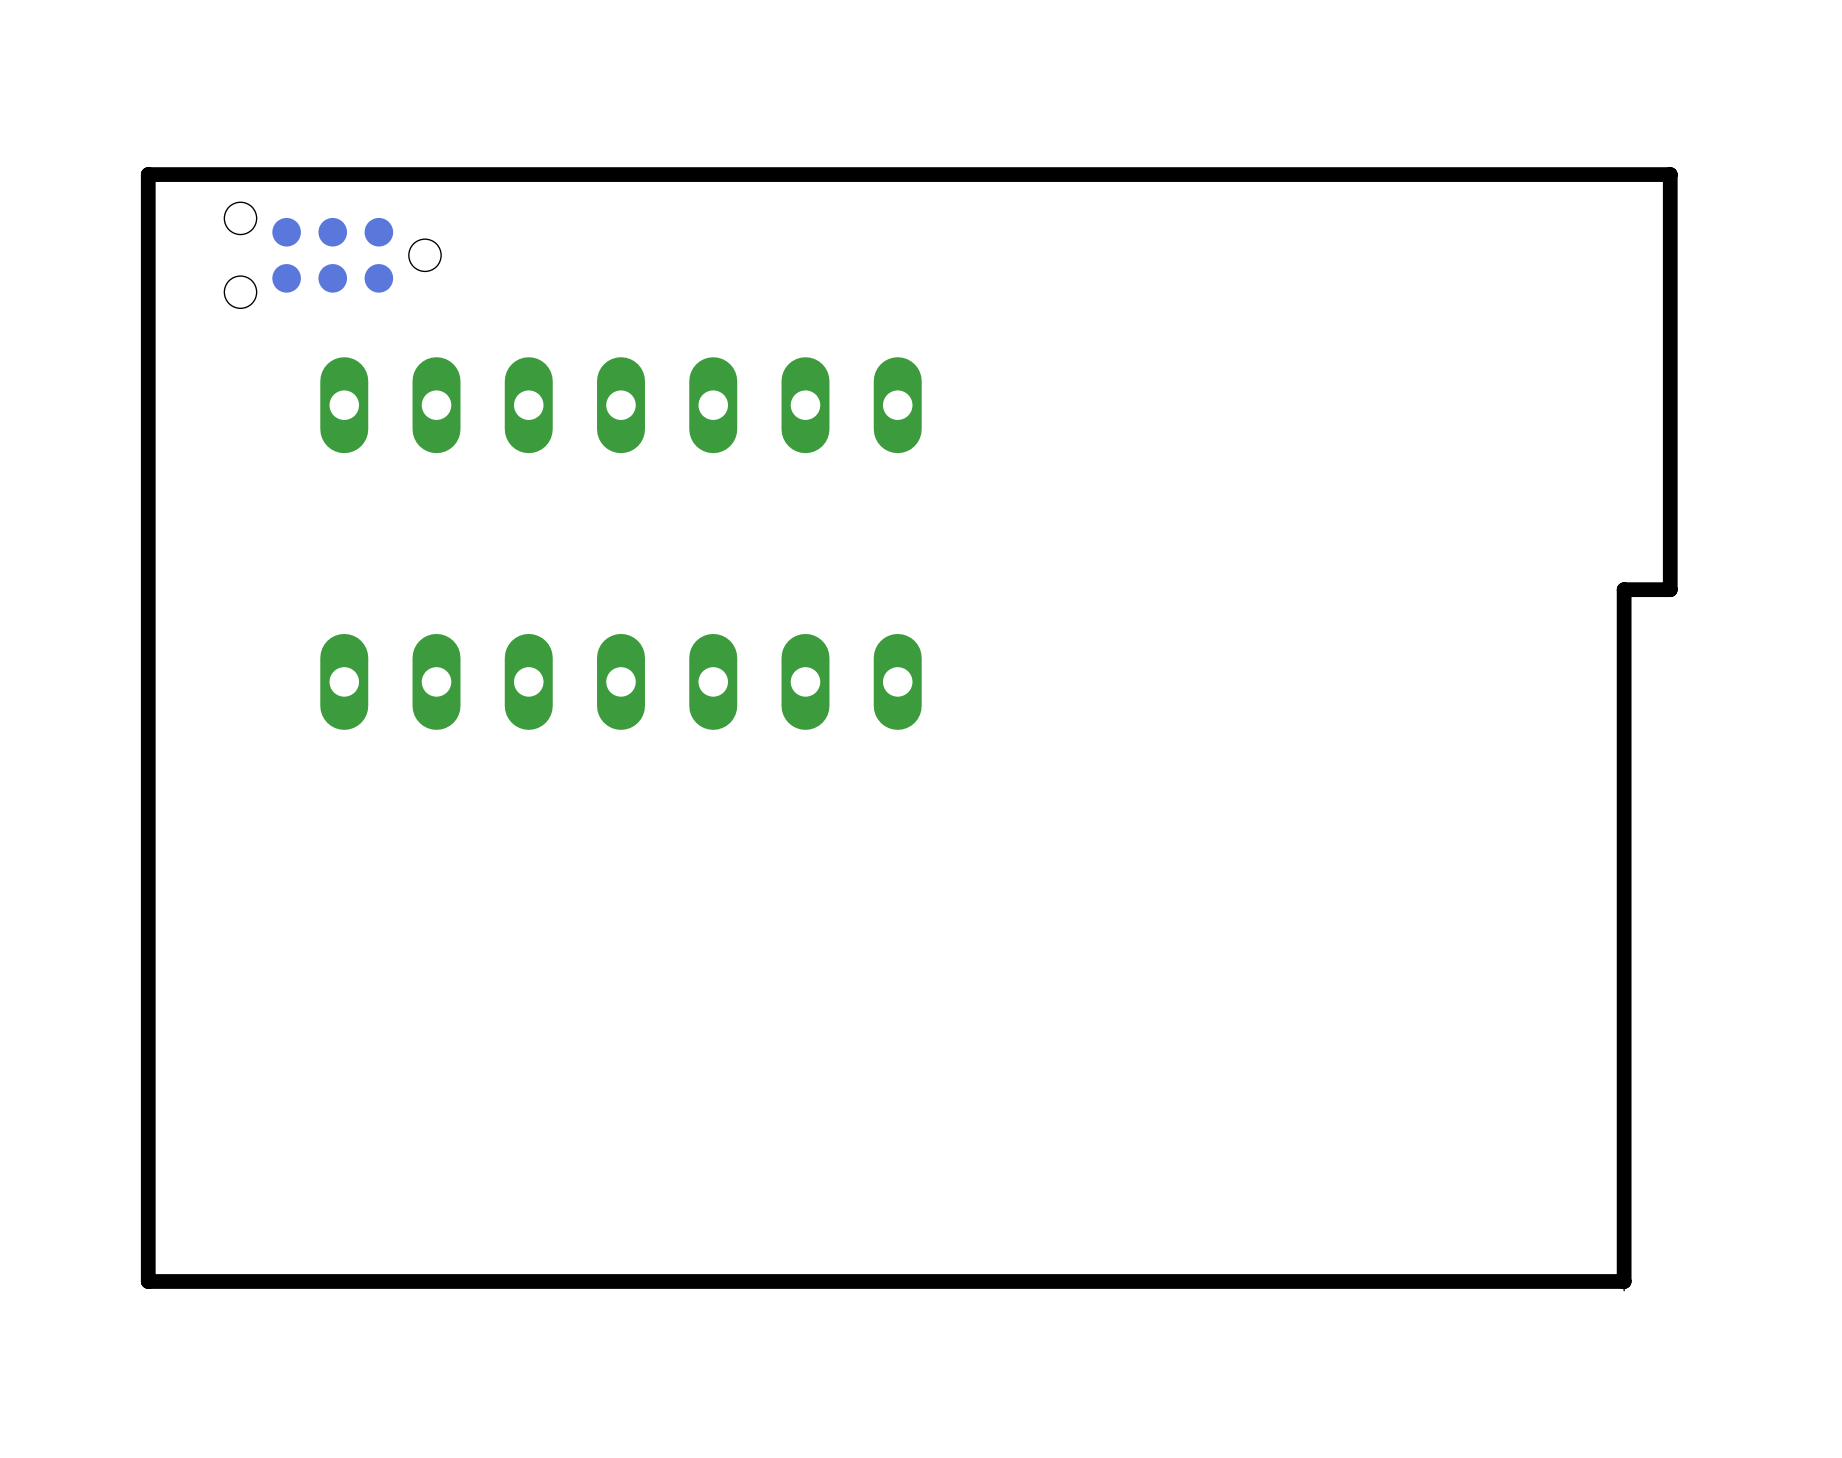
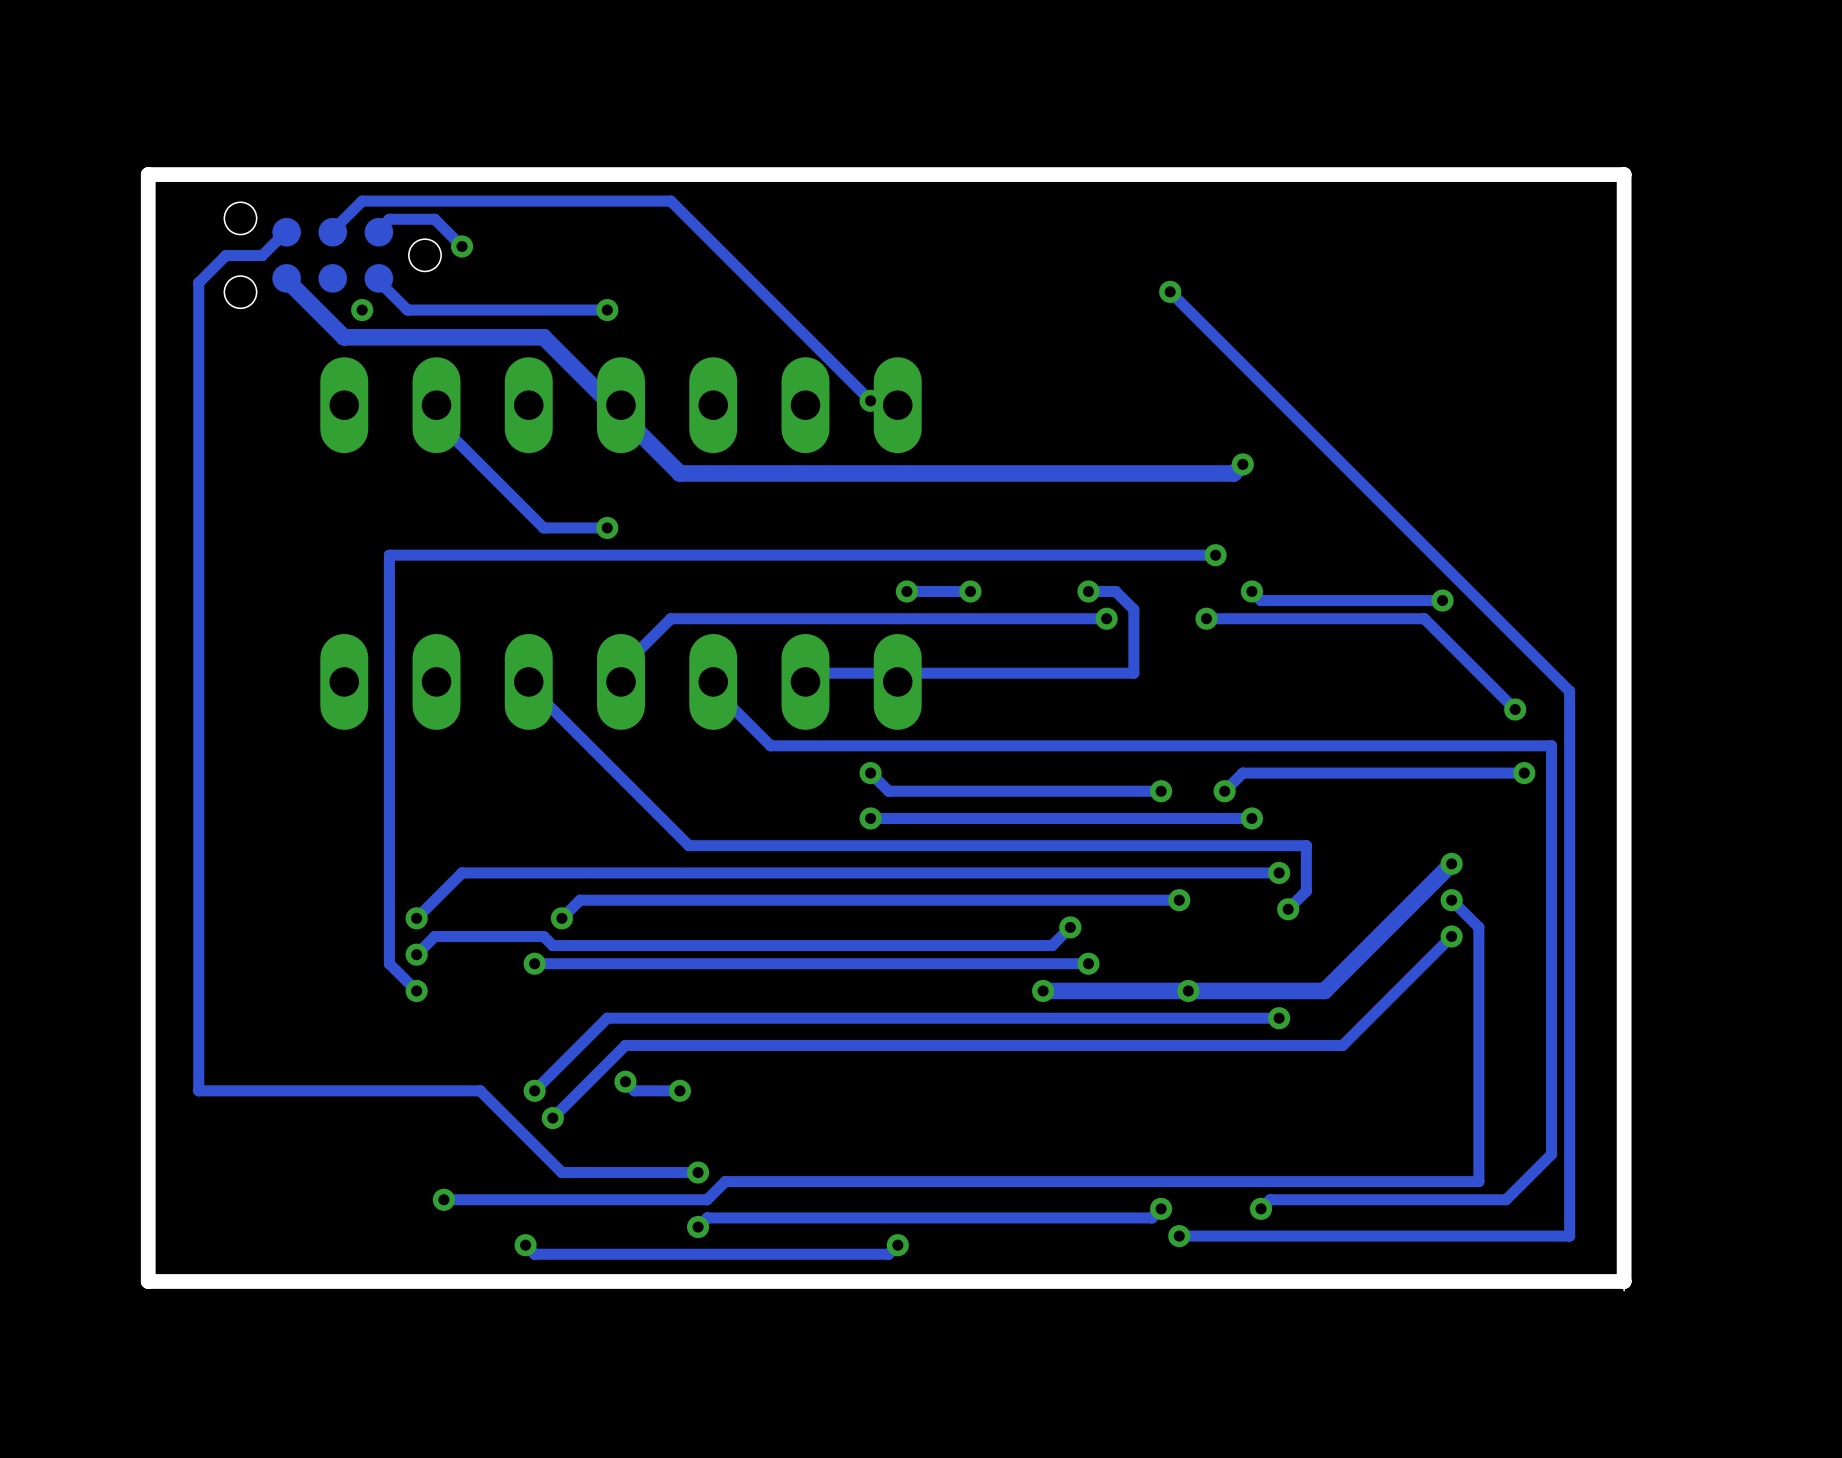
board edge: (1624, 174) (1670, 174) (1670, 589) (1624, 589) -> (1624, 174) (1624, 589)
track: none -> (286, 232) (262, 255) (225, 255) (198, 282) (198, 1090) (480, 1090) (561, 1172) (698, 1172)
track: none -> (332, 232) (362, 201) (670, 201) (870, 400)
track: none -> (378, 232) (389, 219) (434, 219) (462, 246)
via: none -> (462, 246)
track: none -> (286, 278) (344, 337) (543, 337) (609, 405) (679, 473) (1233, 473) (1242, 464)
track: none -> (378, 278) (380, 282) (407, 310) (607, 310)
track: none -> (1170, 291) (1569, 691) (1569, 1236) (1179, 1236)
via: none -> (1170, 291)
via: none -> (362, 310)
via: none -> (607, 310)
via: none -> (870, 400)
track: none -> (424, 405) (425, 409) (543, 527) (607, 527)
via: none -> (1242, 464)
via: none -> (607, 527)
track: none -> (1215, 555) (389, 555) (389, 963) (416, 990)
via: none -> (1215, 555)
via: none -> (906, 591)
track: none -> (970, 591) (906, 591)
via: none -> (970, 591)
track: none -> (1088, 591) (1115, 591) (1133, 609) (1133, 673) (797, 673) (793, 681)
via: none -> (1088, 591)
track: none -> (1251, 591) (1260, 600) (1442, 600)
via: none -> (1251, 591)
via: none -> (1442, 600)
track: none -> (1106, 618) (670, 618) (609, 681)
via: none -> (1106, 618)
track: none -> (1206, 618) (1424, 618) (1515, 709)
via: none -> (1206, 618)
track: none -> (517, 681) (525, 682) (689, 845) (1306, 845) (1306, 891) (1288, 909)
track: none -> (701, 681) (707, 682) (770, 745) (1551, 745) (1551, 1154) (1506, 1199) (1270, 1199) (1260, 1208)
via: none -> (1515, 709)
track: none -> (870, 773) (888, 791) (1161, 791)
via: none -> (870, 773)
track: none -> (1524, 773) (1242, 773) (1224, 791)
via: none -> (1524, 773)
via: none -> (1161, 791)
via: none -> (1224, 791)
via: none -> (870, 818)
track: none -> (1251, 818) (870, 818)
via: none -> (1251, 818)
track: none -> (1451, 863) (1324, 990) (1043, 990)
via: none -> (1451, 863)
track: none -> (1279, 872) (462, 872) (416, 918)
via: none -> (1279, 872)
track: none -> (1179, 900) (580, 900) (561, 918)
via: none -> (1179, 900)
track: none -> (1451, 900) (1478, 927) (1478, 1181) (725, 1181) (707, 1199) (443, 1199)
via: none -> (1451, 900)
via: none -> (1288, 909)
via: none -> (416, 918)
via: none -> (561, 918)
track: none -> (1070, 927) (1052, 945) (552, 945) (543, 936) (434, 936) (416, 954)
via: none -> (1070, 927)
track: none -> (1451, 936) (1342, 1045) (625, 1045) (552, 1118)
via: none -> (1451, 936)
via: none -> (416, 954)
via: none -> (534, 963)
track: none -> (1088, 963) (534, 963)
via: none -> (1088, 963)
via: none -> (416, 990)
via: none -> (1043, 990)
via: none -> (1188, 990)
track: none -> (1279, 1018) (607, 1018) (534, 1090)
via: none -> (1279, 1018)
track: none -> (625, 1081) (634, 1090) (679, 1090)
via: none -> (625, 1081)
via: none -> (534, 1090)
via: none -> (679, 1090)
via: none -> (552, 1118)
via: none -> (698, 1172)
via: none -> (443, 1199)
track: none -> (1161, 1208) (1152, 1217) (707, 1217) (698, 1227)
via: none -> (1161, 1208)
via: none -> (1260, 1208)
via: none -> (698, 1227)
via: none -> (1179, 1236)
via: none -> (525, 1245)
track: none -> (897, 1245) (888, 1254) (534, 1254) (525, 1245)
via: none -> (897, 1245)

